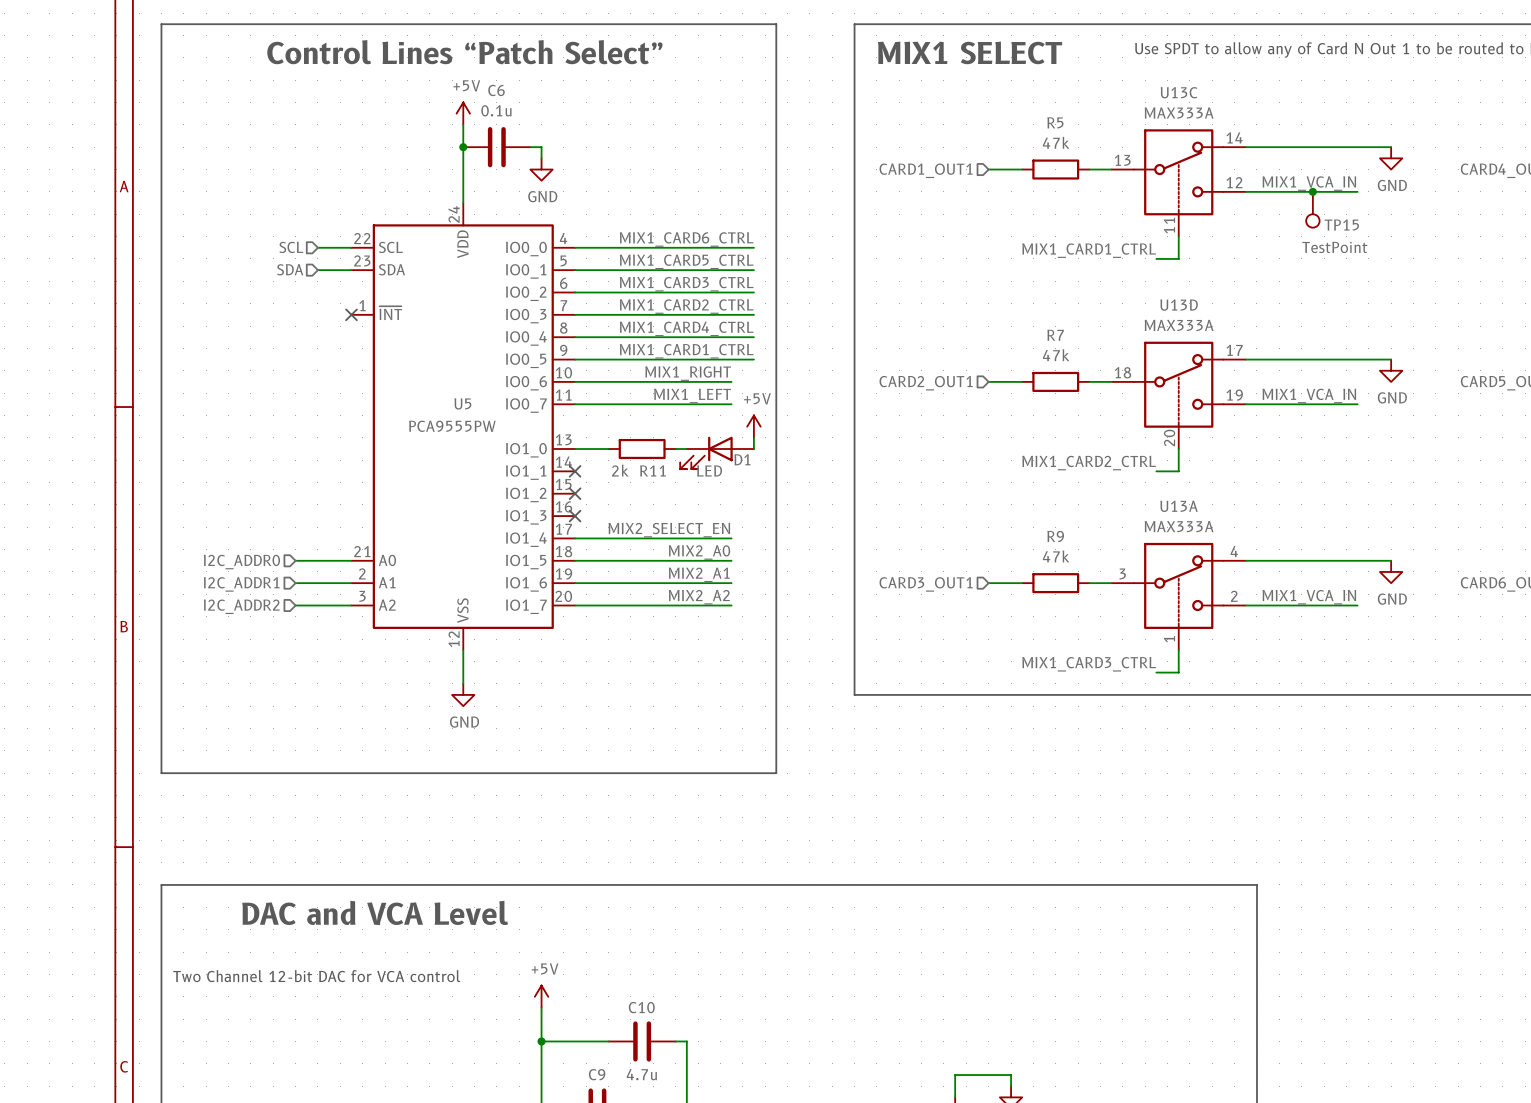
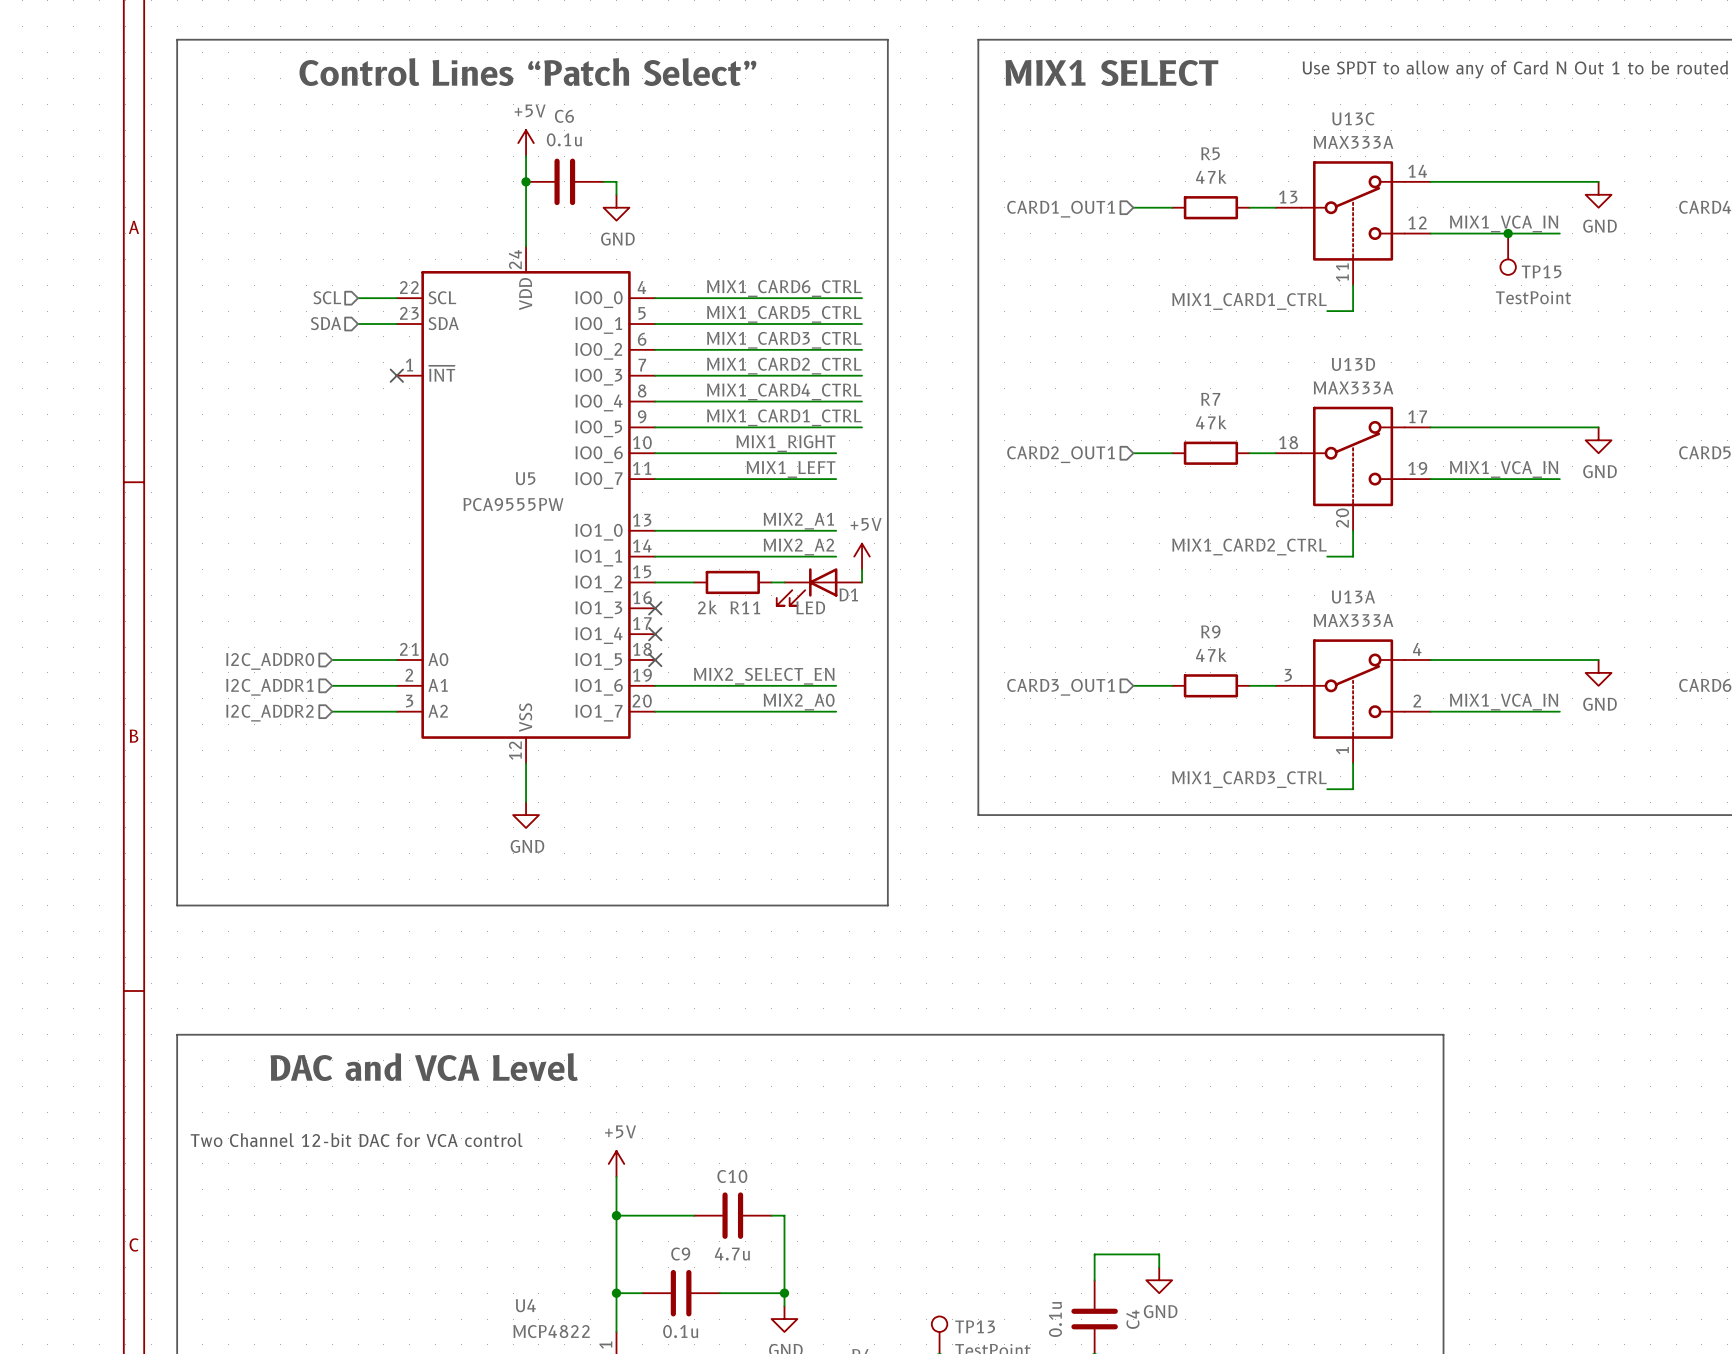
power symbol position: +5V (753, 426) -> +5V (862, 556)
wire: (753, 437) (753, 449) -> (862, 569) (862, 582)
label: none -> MIX2_A1 (798, 521)
wire: none -> (694, 530) (771, 530)
R11 position: (642, 449) -> (732, 582)
D1 position: (717, 452) -> (819, 586)
label: none -> MIX2_A2 (798, 547)
no-connect mark: (575, 471) -> none
wire: none -> (655, 582) (694, 582)
no-connect mark: (575, 493) -> none
wire: none -> (771, 582) (784, 582)
label: MIX2_SELECT_EN (669, 530) -> none
wire: (575, 538) (731, 538) -> (655, 556) (836, 556)
no-connect mark: none -> (655, 634)
label: MIX2_A0 (699, 552) -> none
wire: (575, 560) (731, 560) -> none
no-connect mark: none -> (655, 659)
label: MIX2_A1 (699, 574) -> MIX2_SELECT_EN (764, 676)
label: MIX2_A2 (699, 597) -> MIX2_A0 (799, 702)

